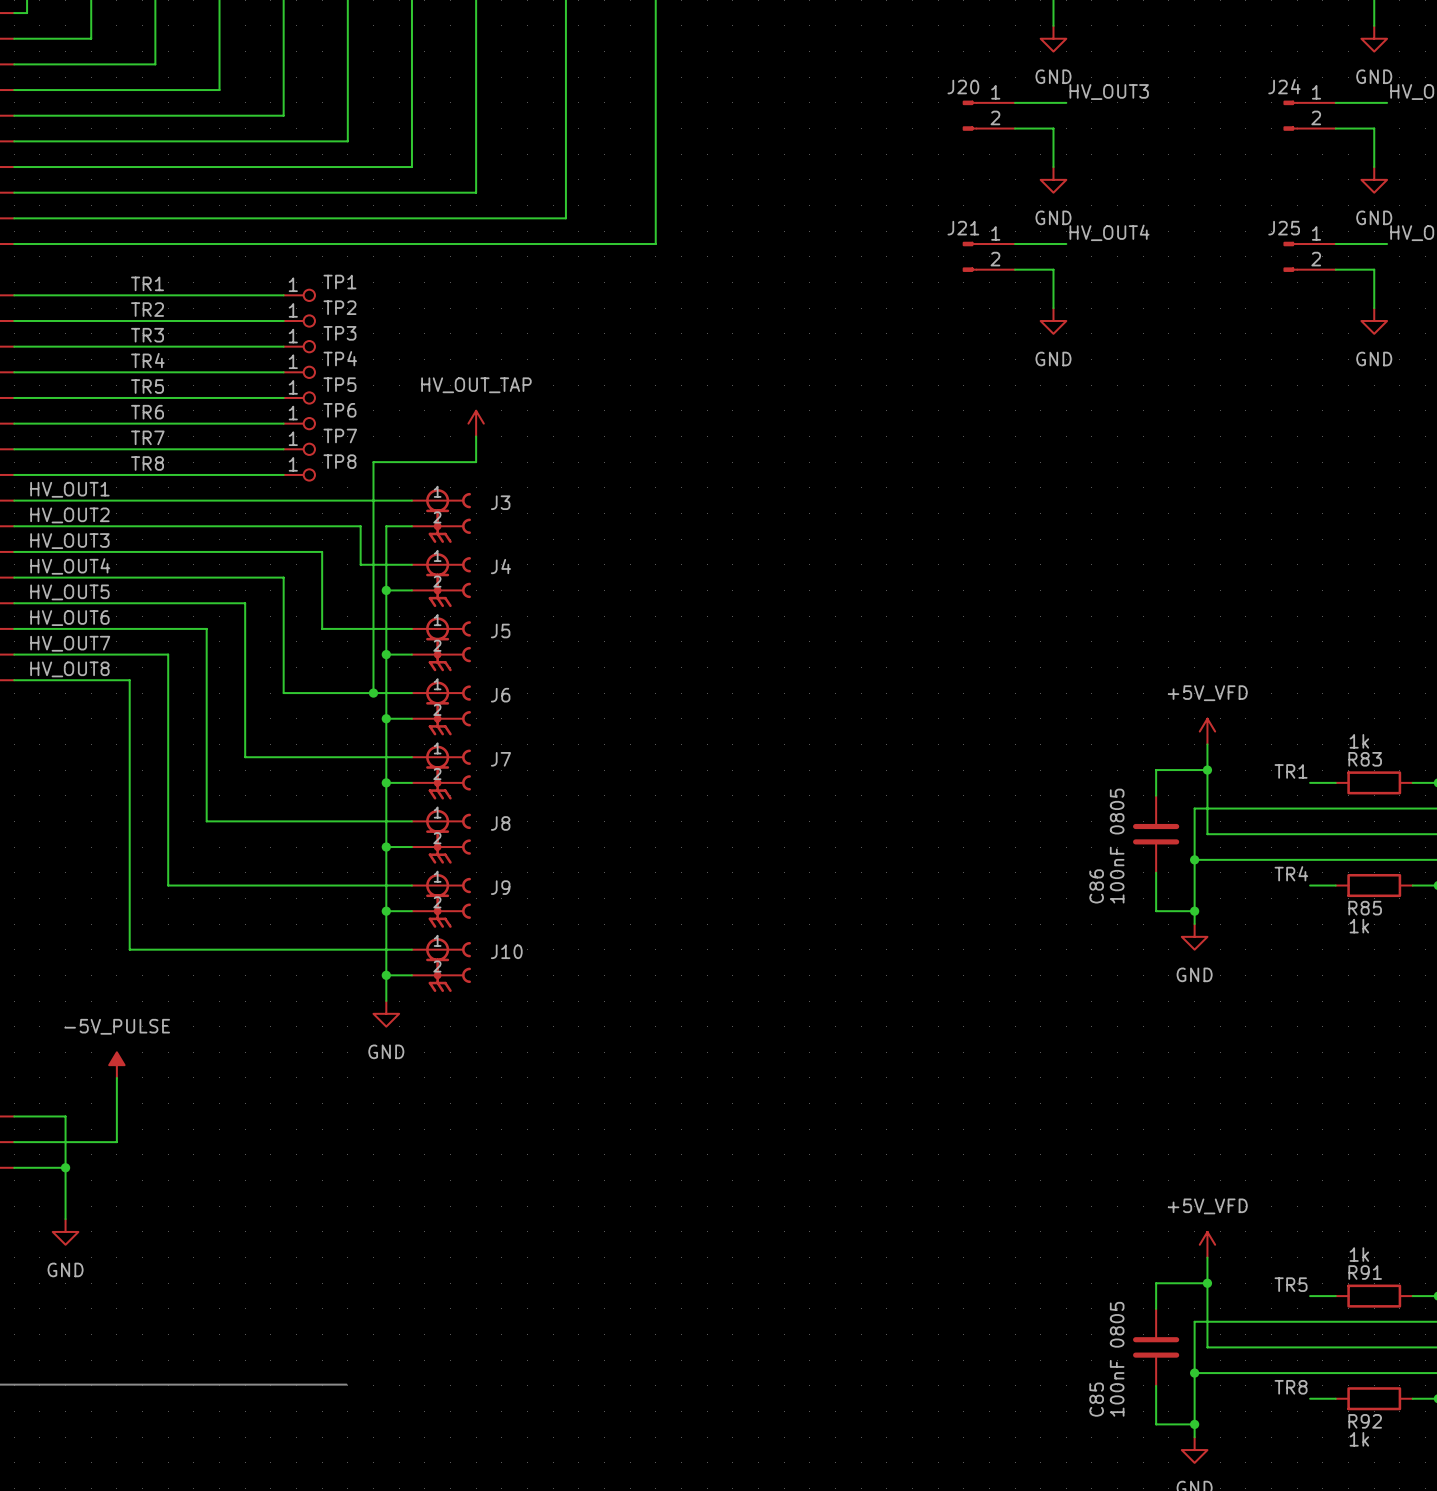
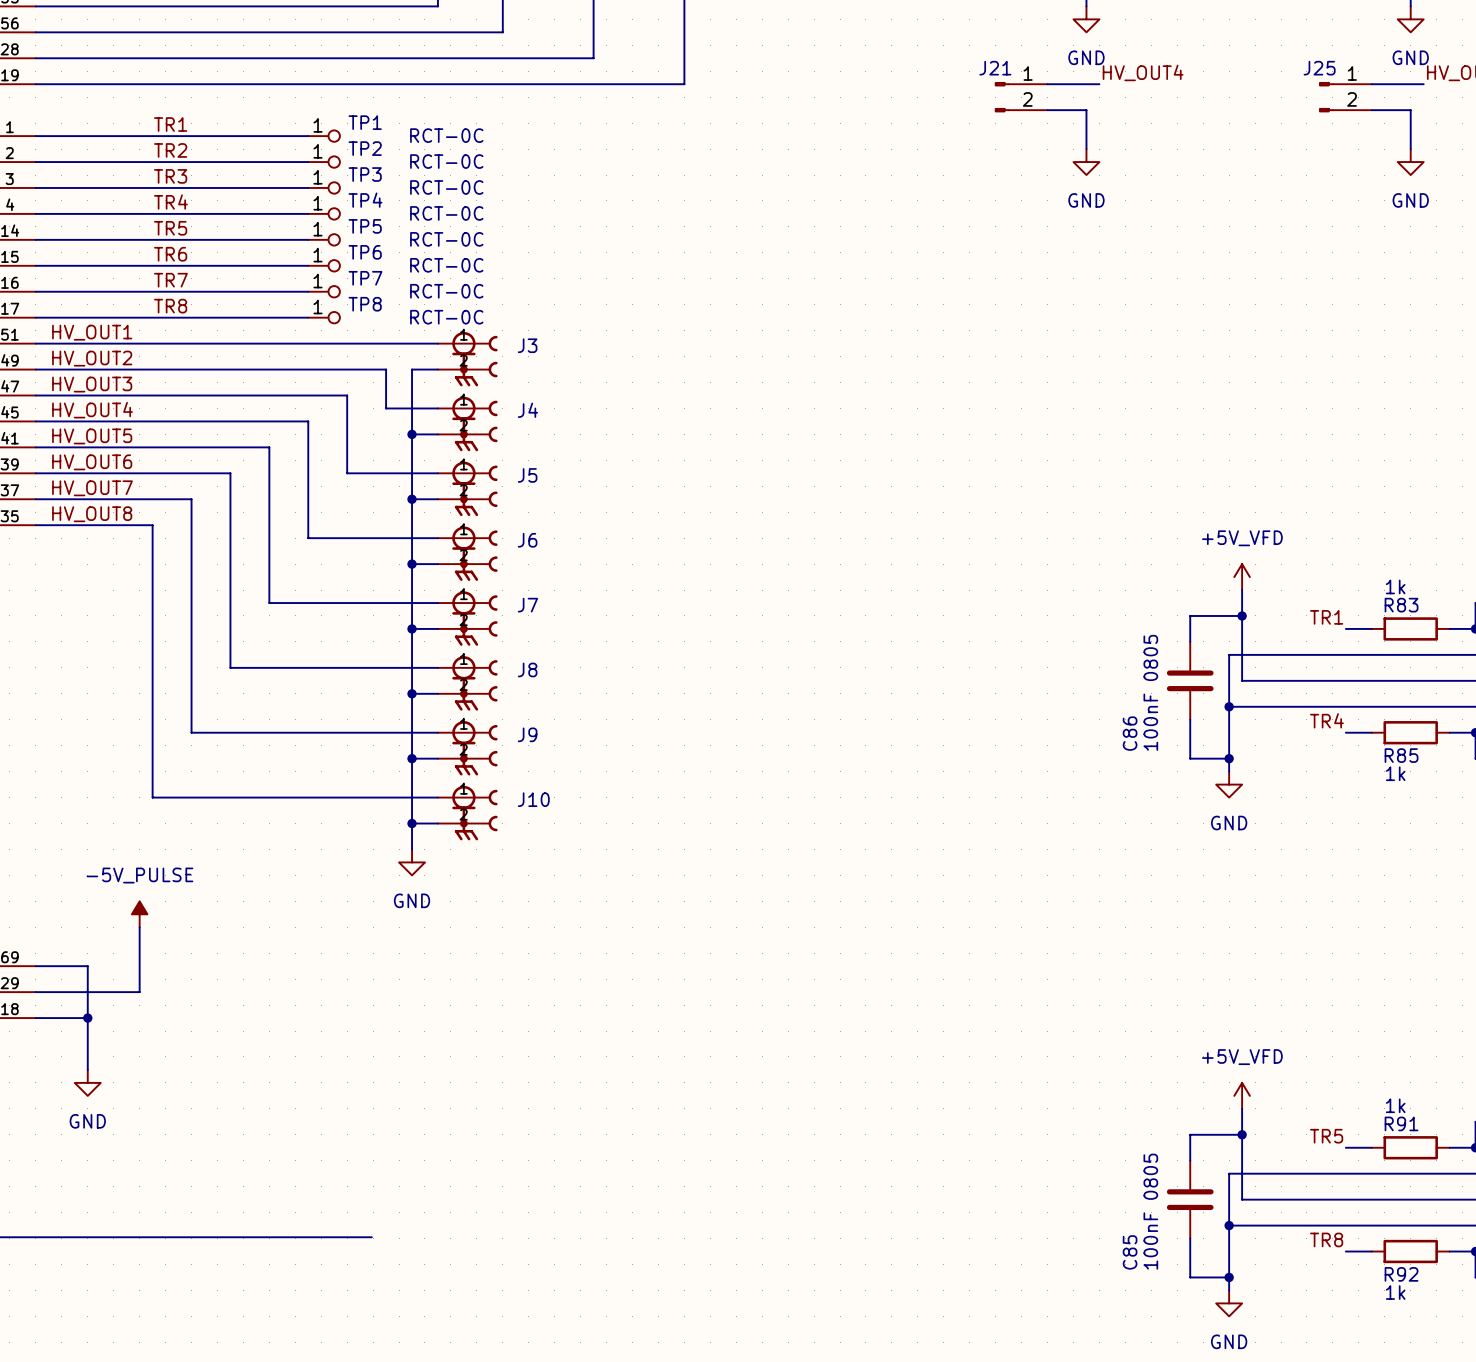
TP1 value: none -> RCT-0C (446, 135)
TP2 value: none -> RCT-0C (446, 161)
TP3 value: none -> RCT-0C (446, 187)
TP4 value: none -> RCT-0C (446, 213)
TP5 value: none -> RCT-0C (446, 239)
TP6 value: none -> RCT-0C (446, 265)
power symbol: HV_OUT_TAP (476, 423) -> none
wire: (476, 436) (476, 462) (373, 462) (373, 693) -> none
TP7 value: none -> RCT-0C (446, 291)
TP8 value: none -> RCT-0C (446, 317)
junction: (373, 693) -> none

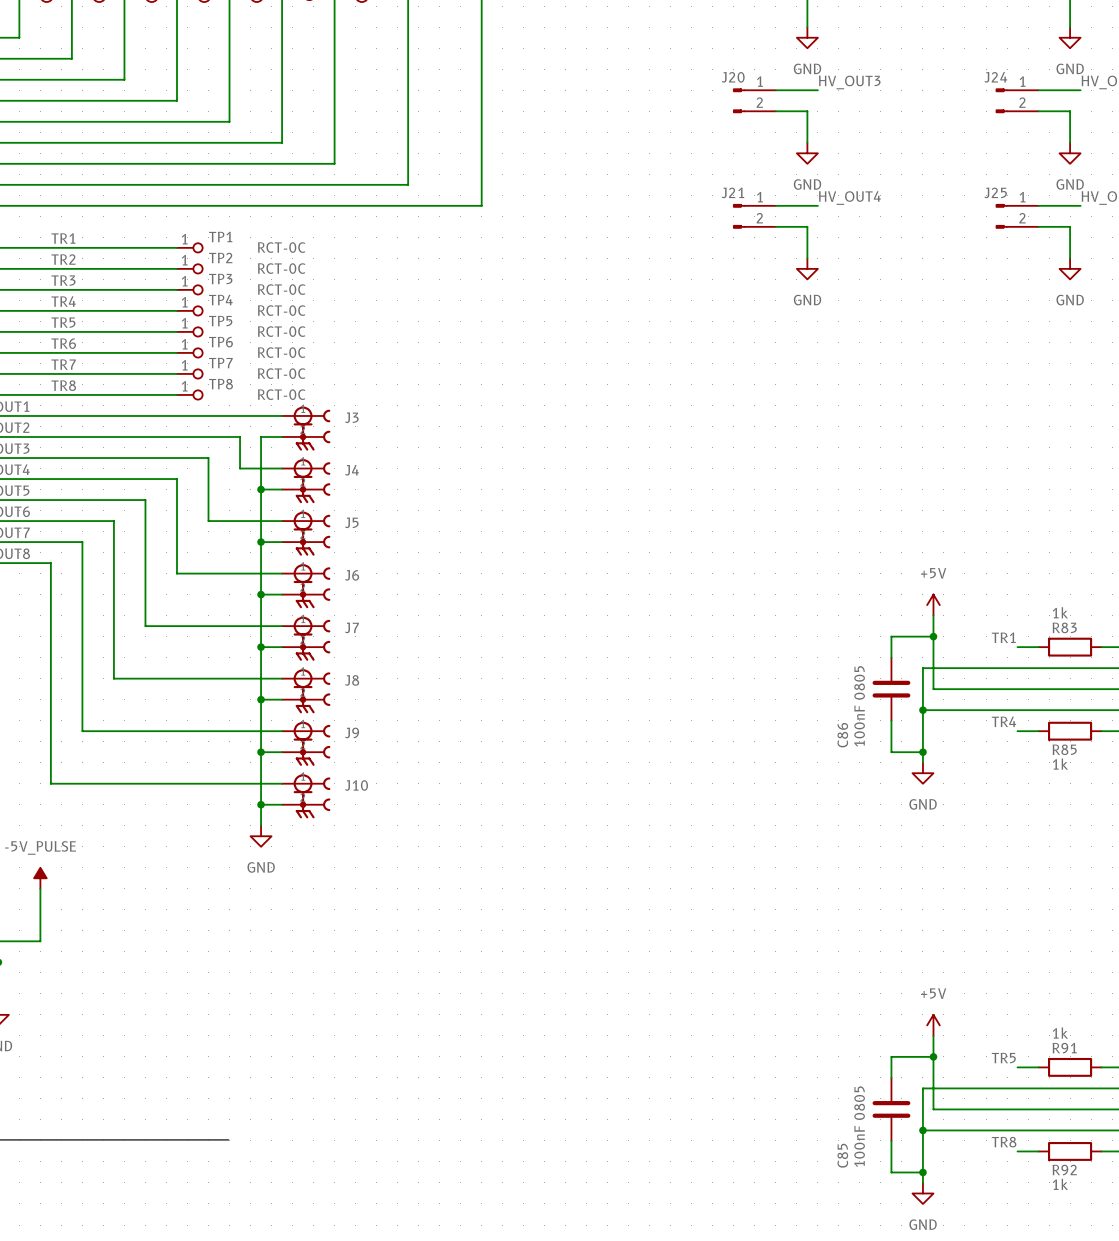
power symbol: +5V_VFD (1242, 577) -> +5V (933, 605)
power symbol: +5V_VFD (1242, 1095) -> +5V (933, 1025)

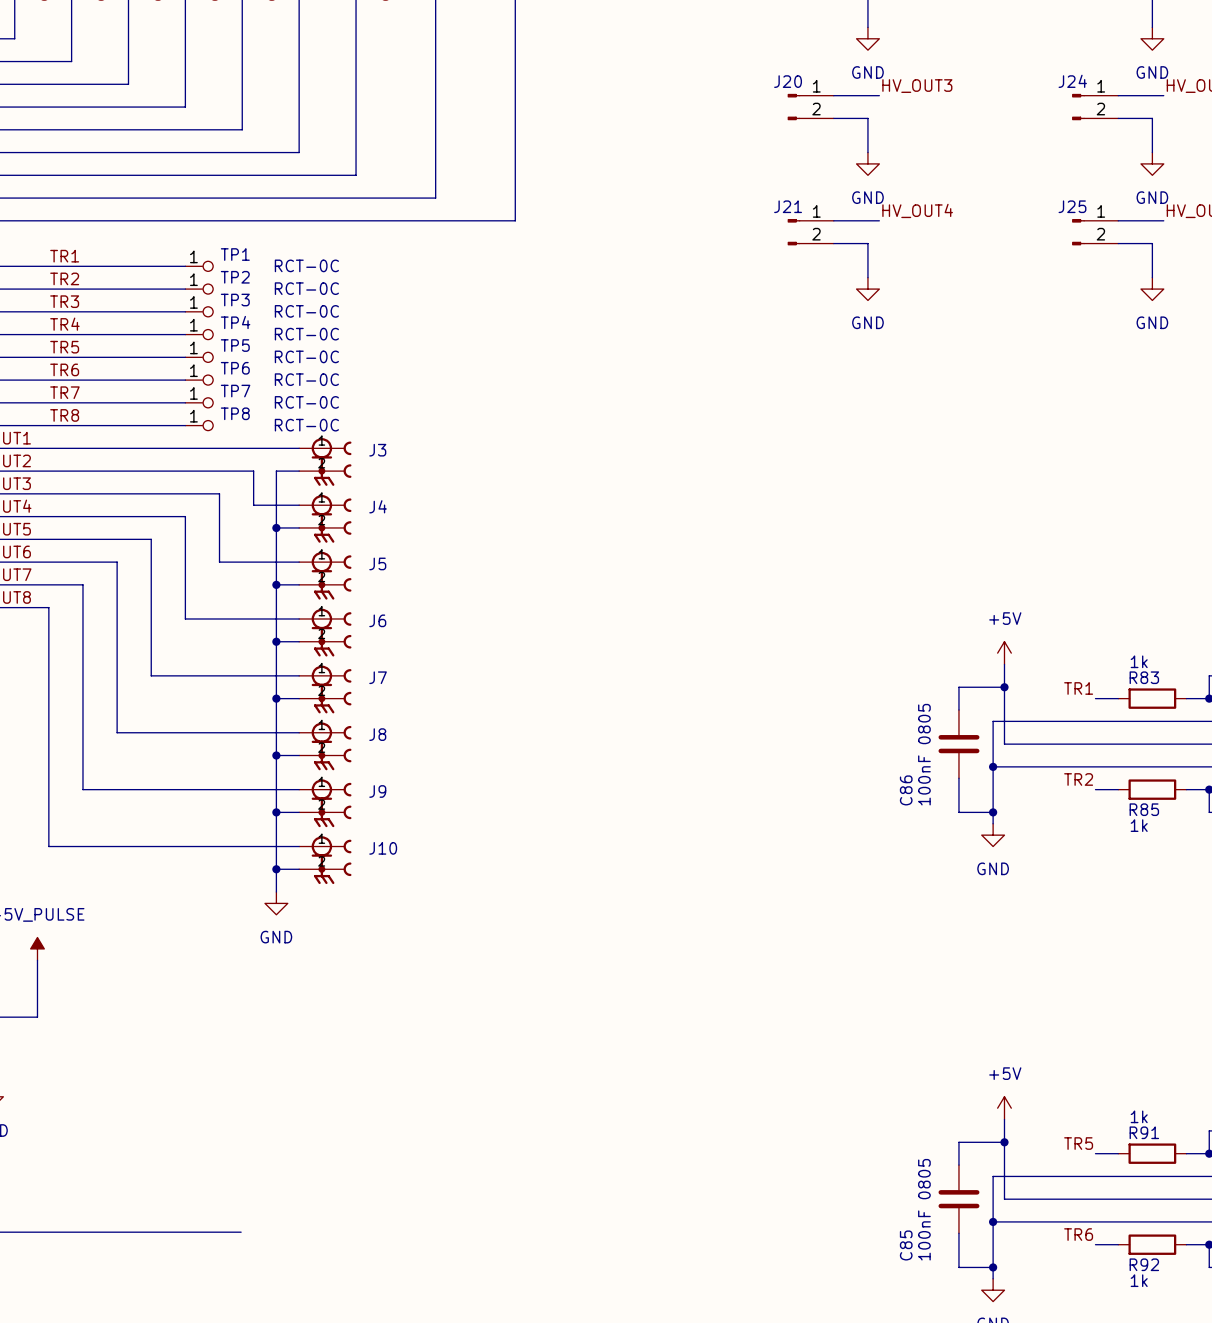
label: TR4 (1003, 721) -> TR2 (1078, 779)
label: TR8 (1004, 1142) -> TR6 (1078, 1234)

